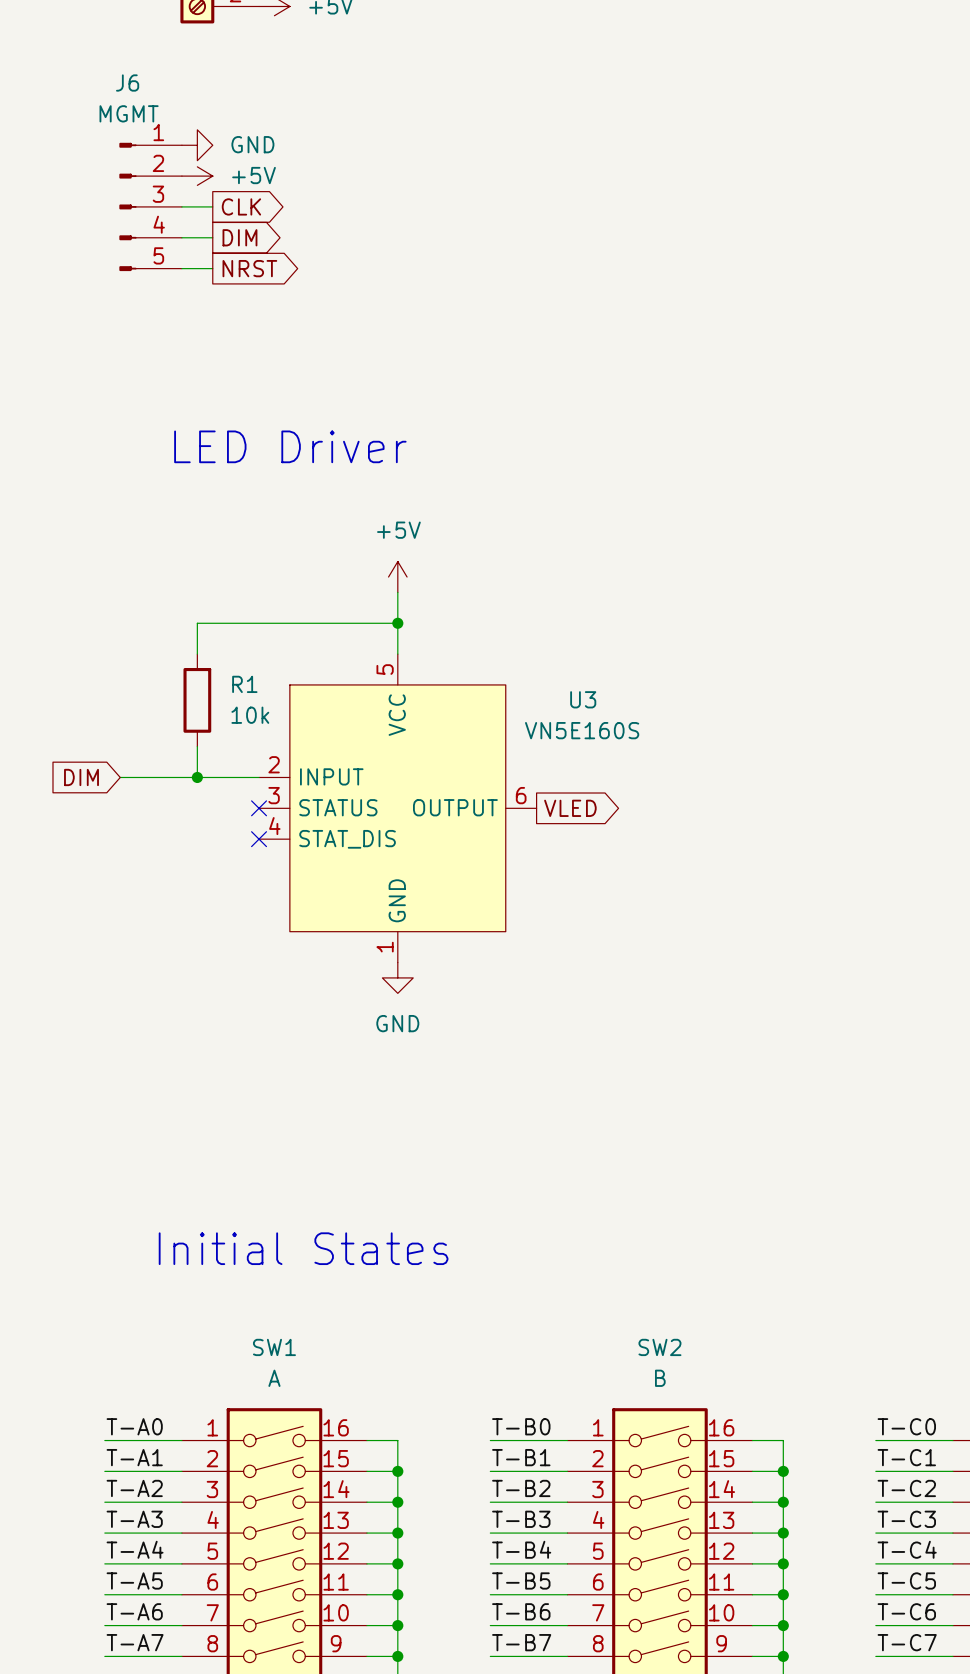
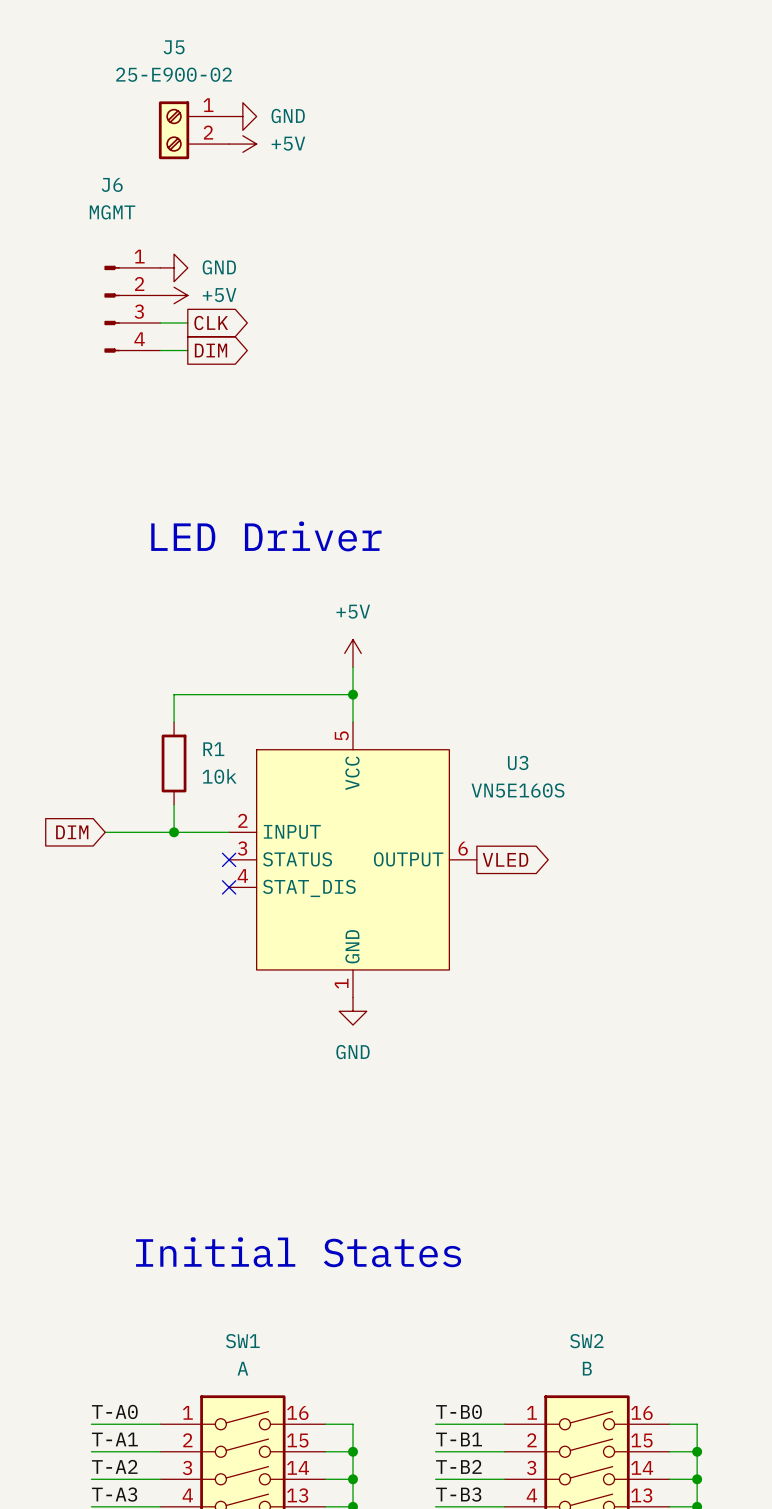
J6 symbol: [119, 142, 182, 272] -> [104, 265, 161, 353]
wire: (181, 268) (212, 268) -> none
global label: NRST (249, 268) -> none

